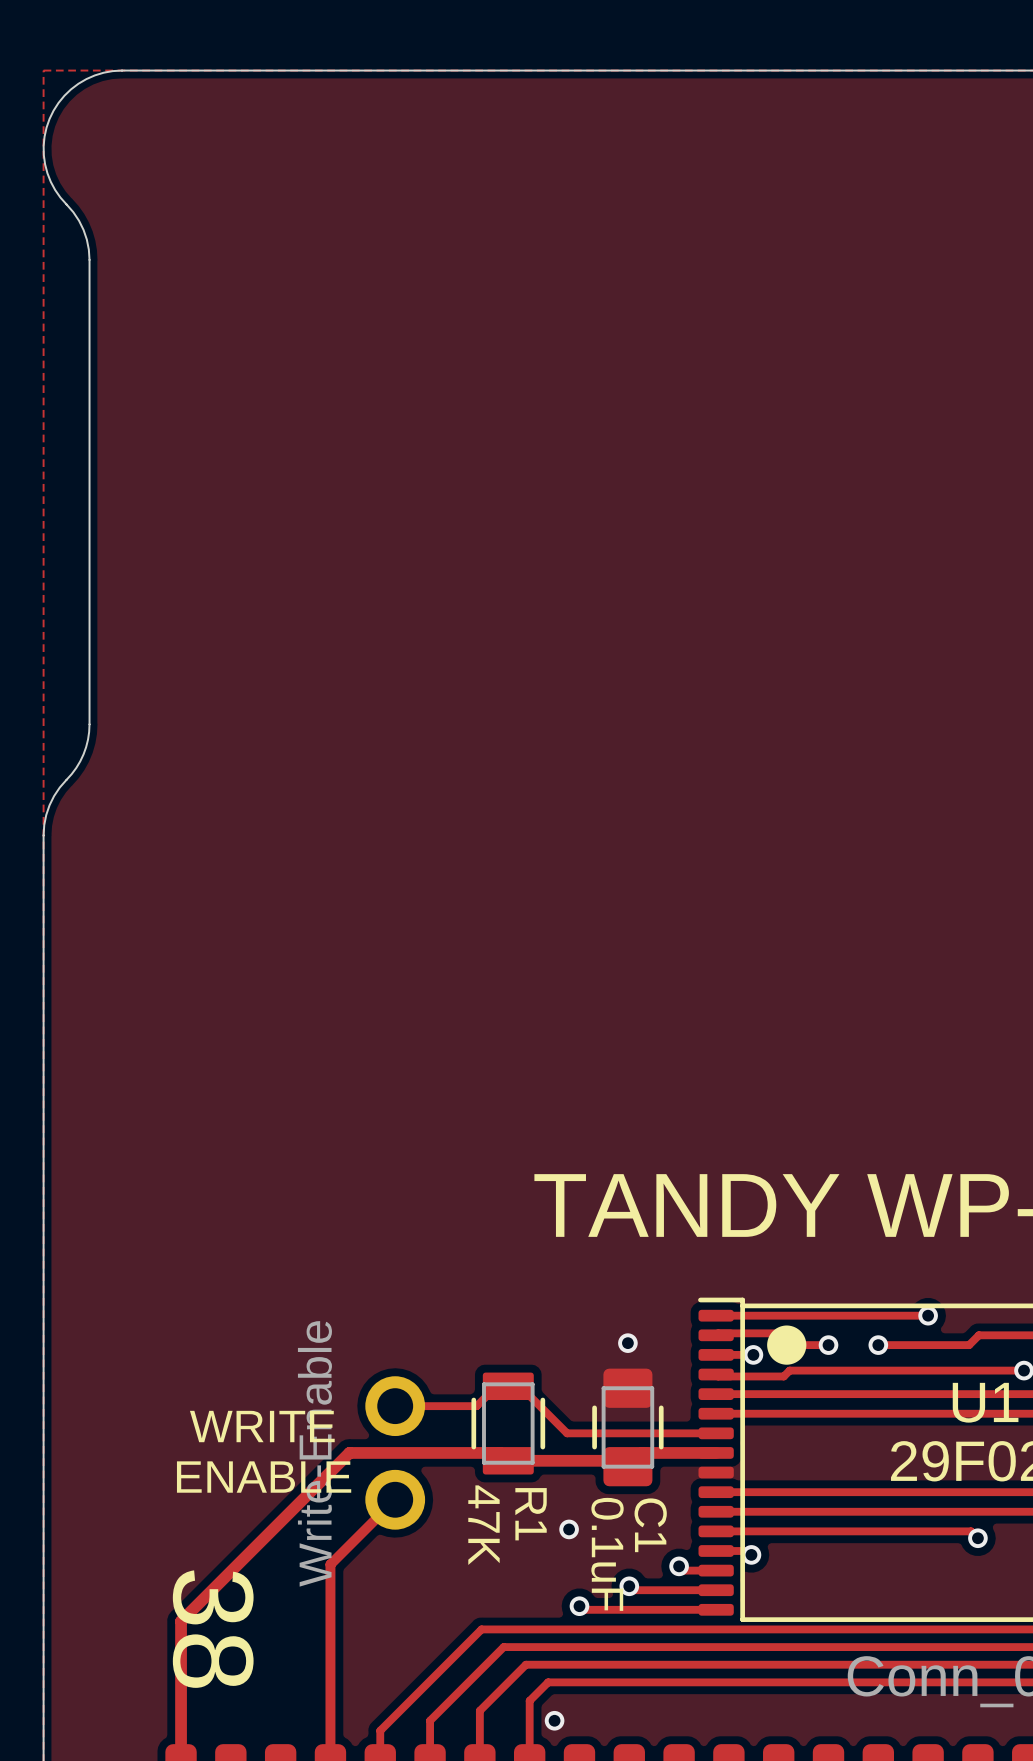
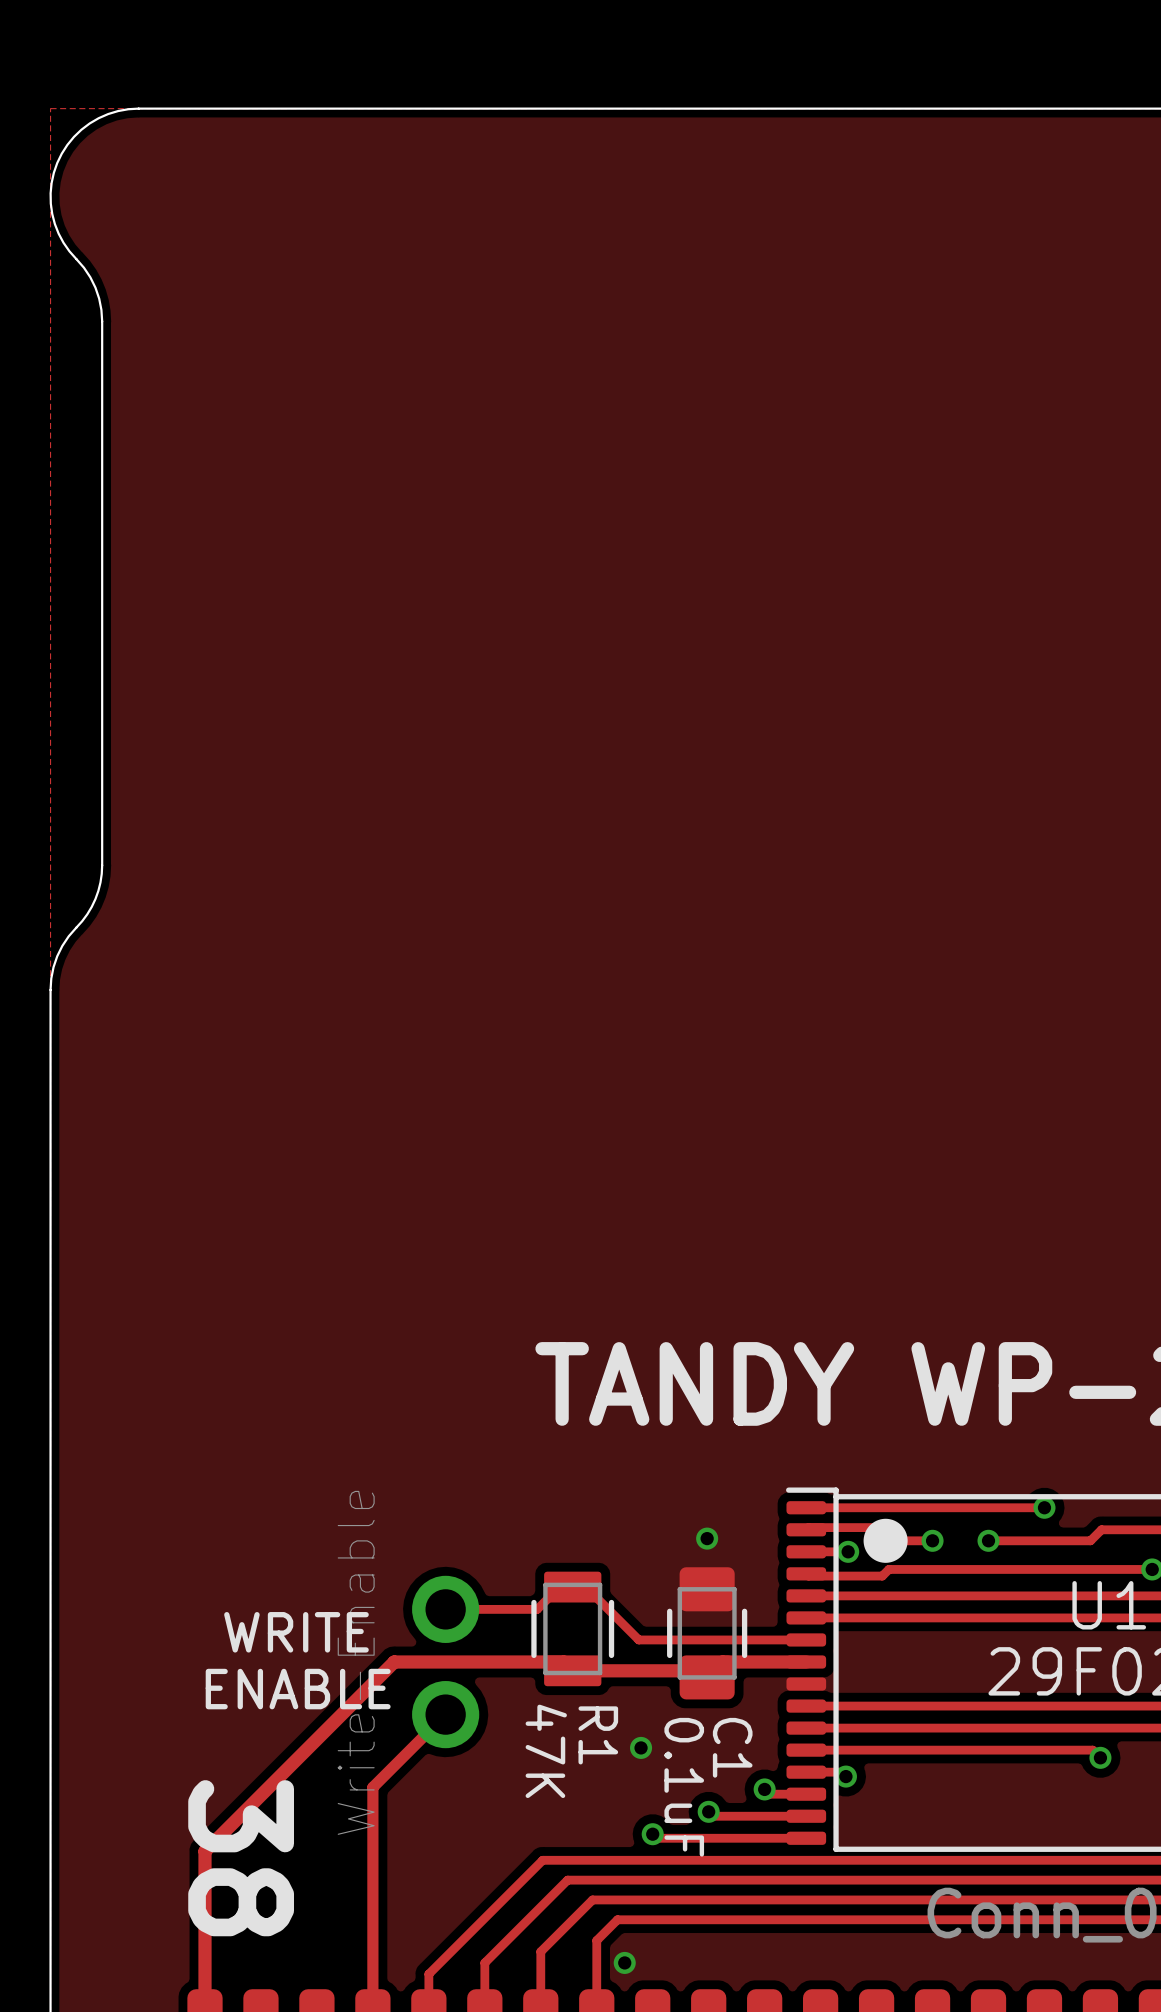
board edge: (89, 724) (88, 739) (80, 761) (59, 787) (49, 805) (44, 825) (43, 854) -> (102, 843) (101, 873) (98, 890) (87, 914) (68, 936) (57, 956) (53, 967) (50, 989)

